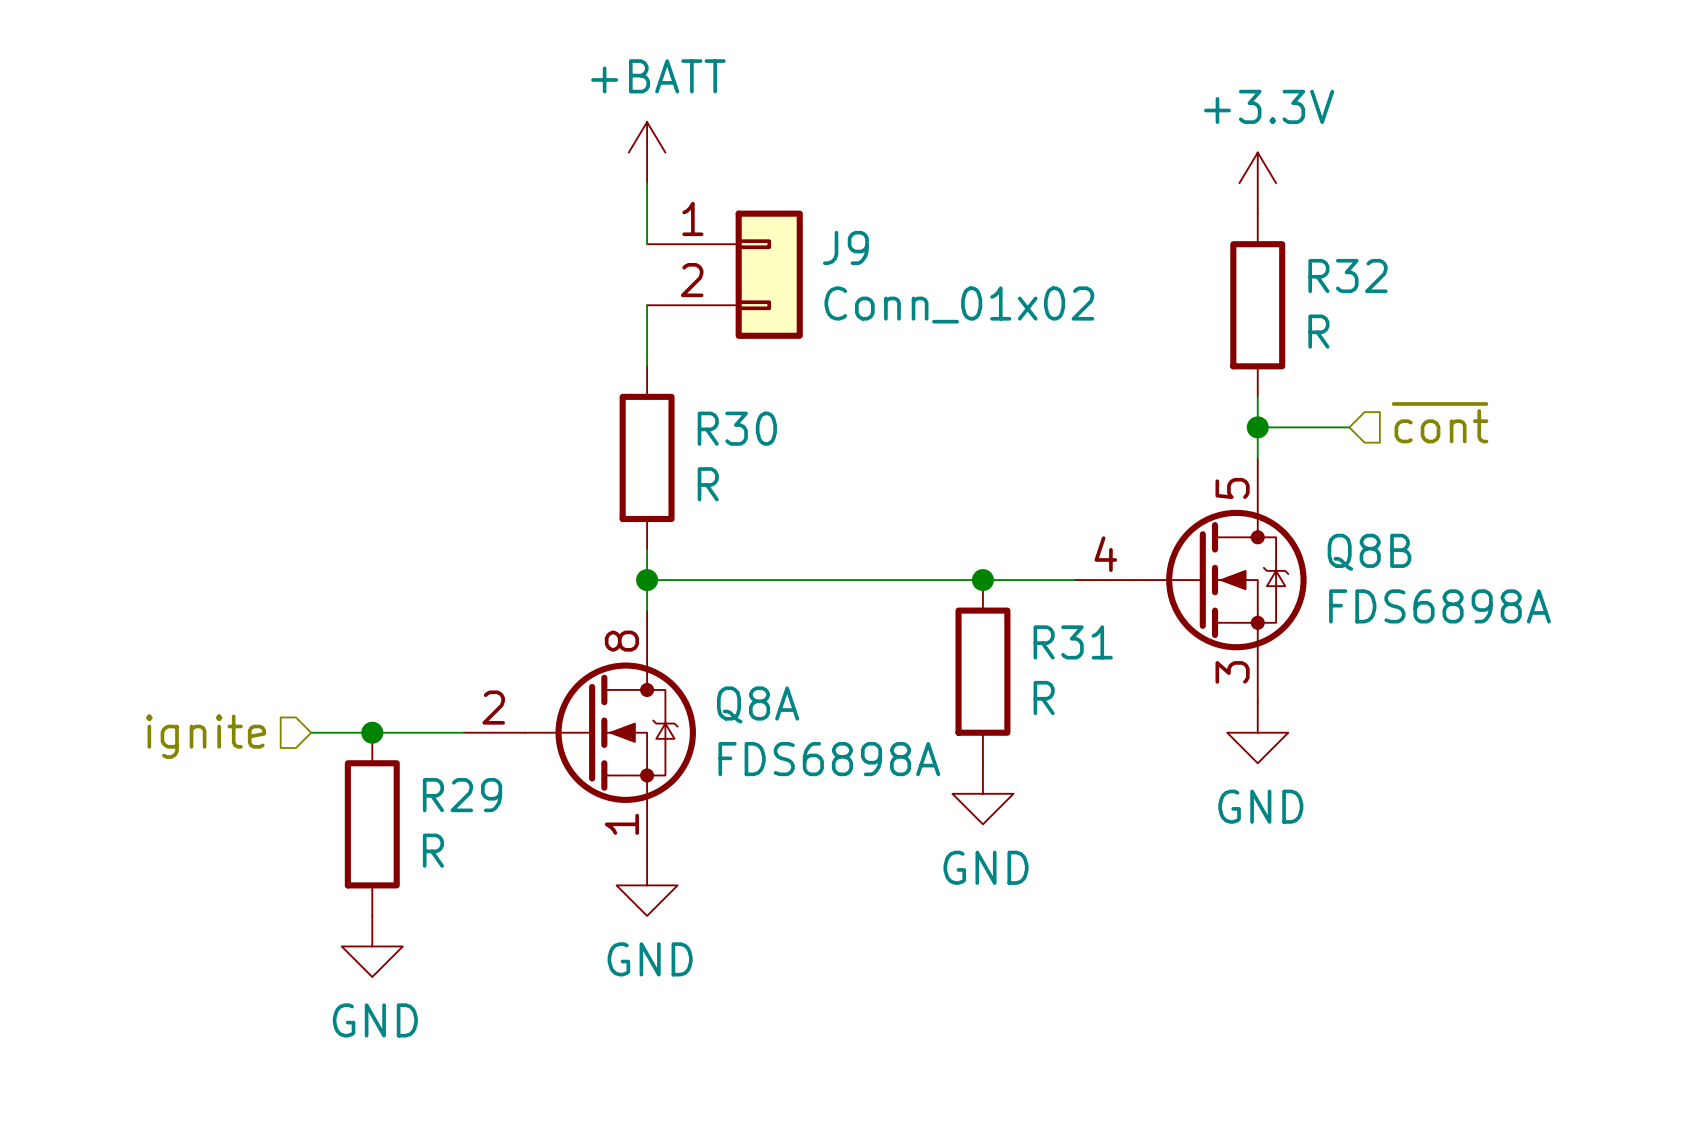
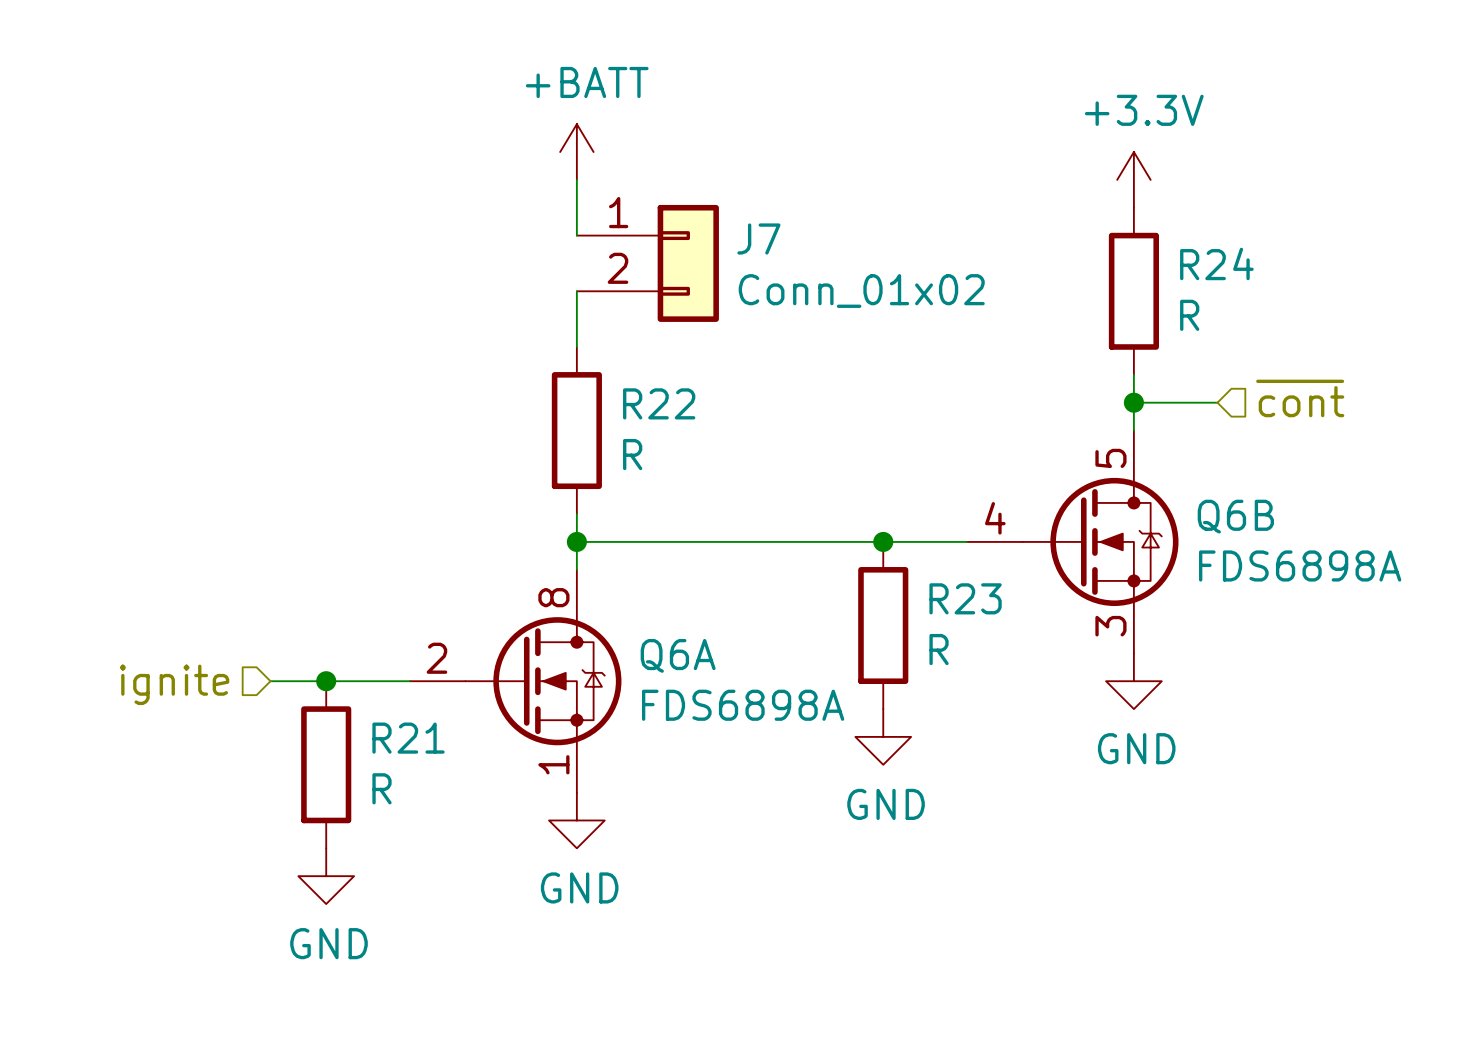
J9 name: J9 (845, 247) -> J7 (758, 239)
R32 name: R32 (1347, 276) -> R24 (1216, 263)
R30 name: R30 (737, 428) -> R22 (659, 403)
Q8B name: Q8B (1369, 552) -> Q6B (1235, 516)
R31 name: R31 (1073, 642) -> R23 (965, 598)
Q8A name: Q8A (758, 704) -> Q6A (678, 655)
R29 name: R29 (462, 795) -> R21 (408, 738)

